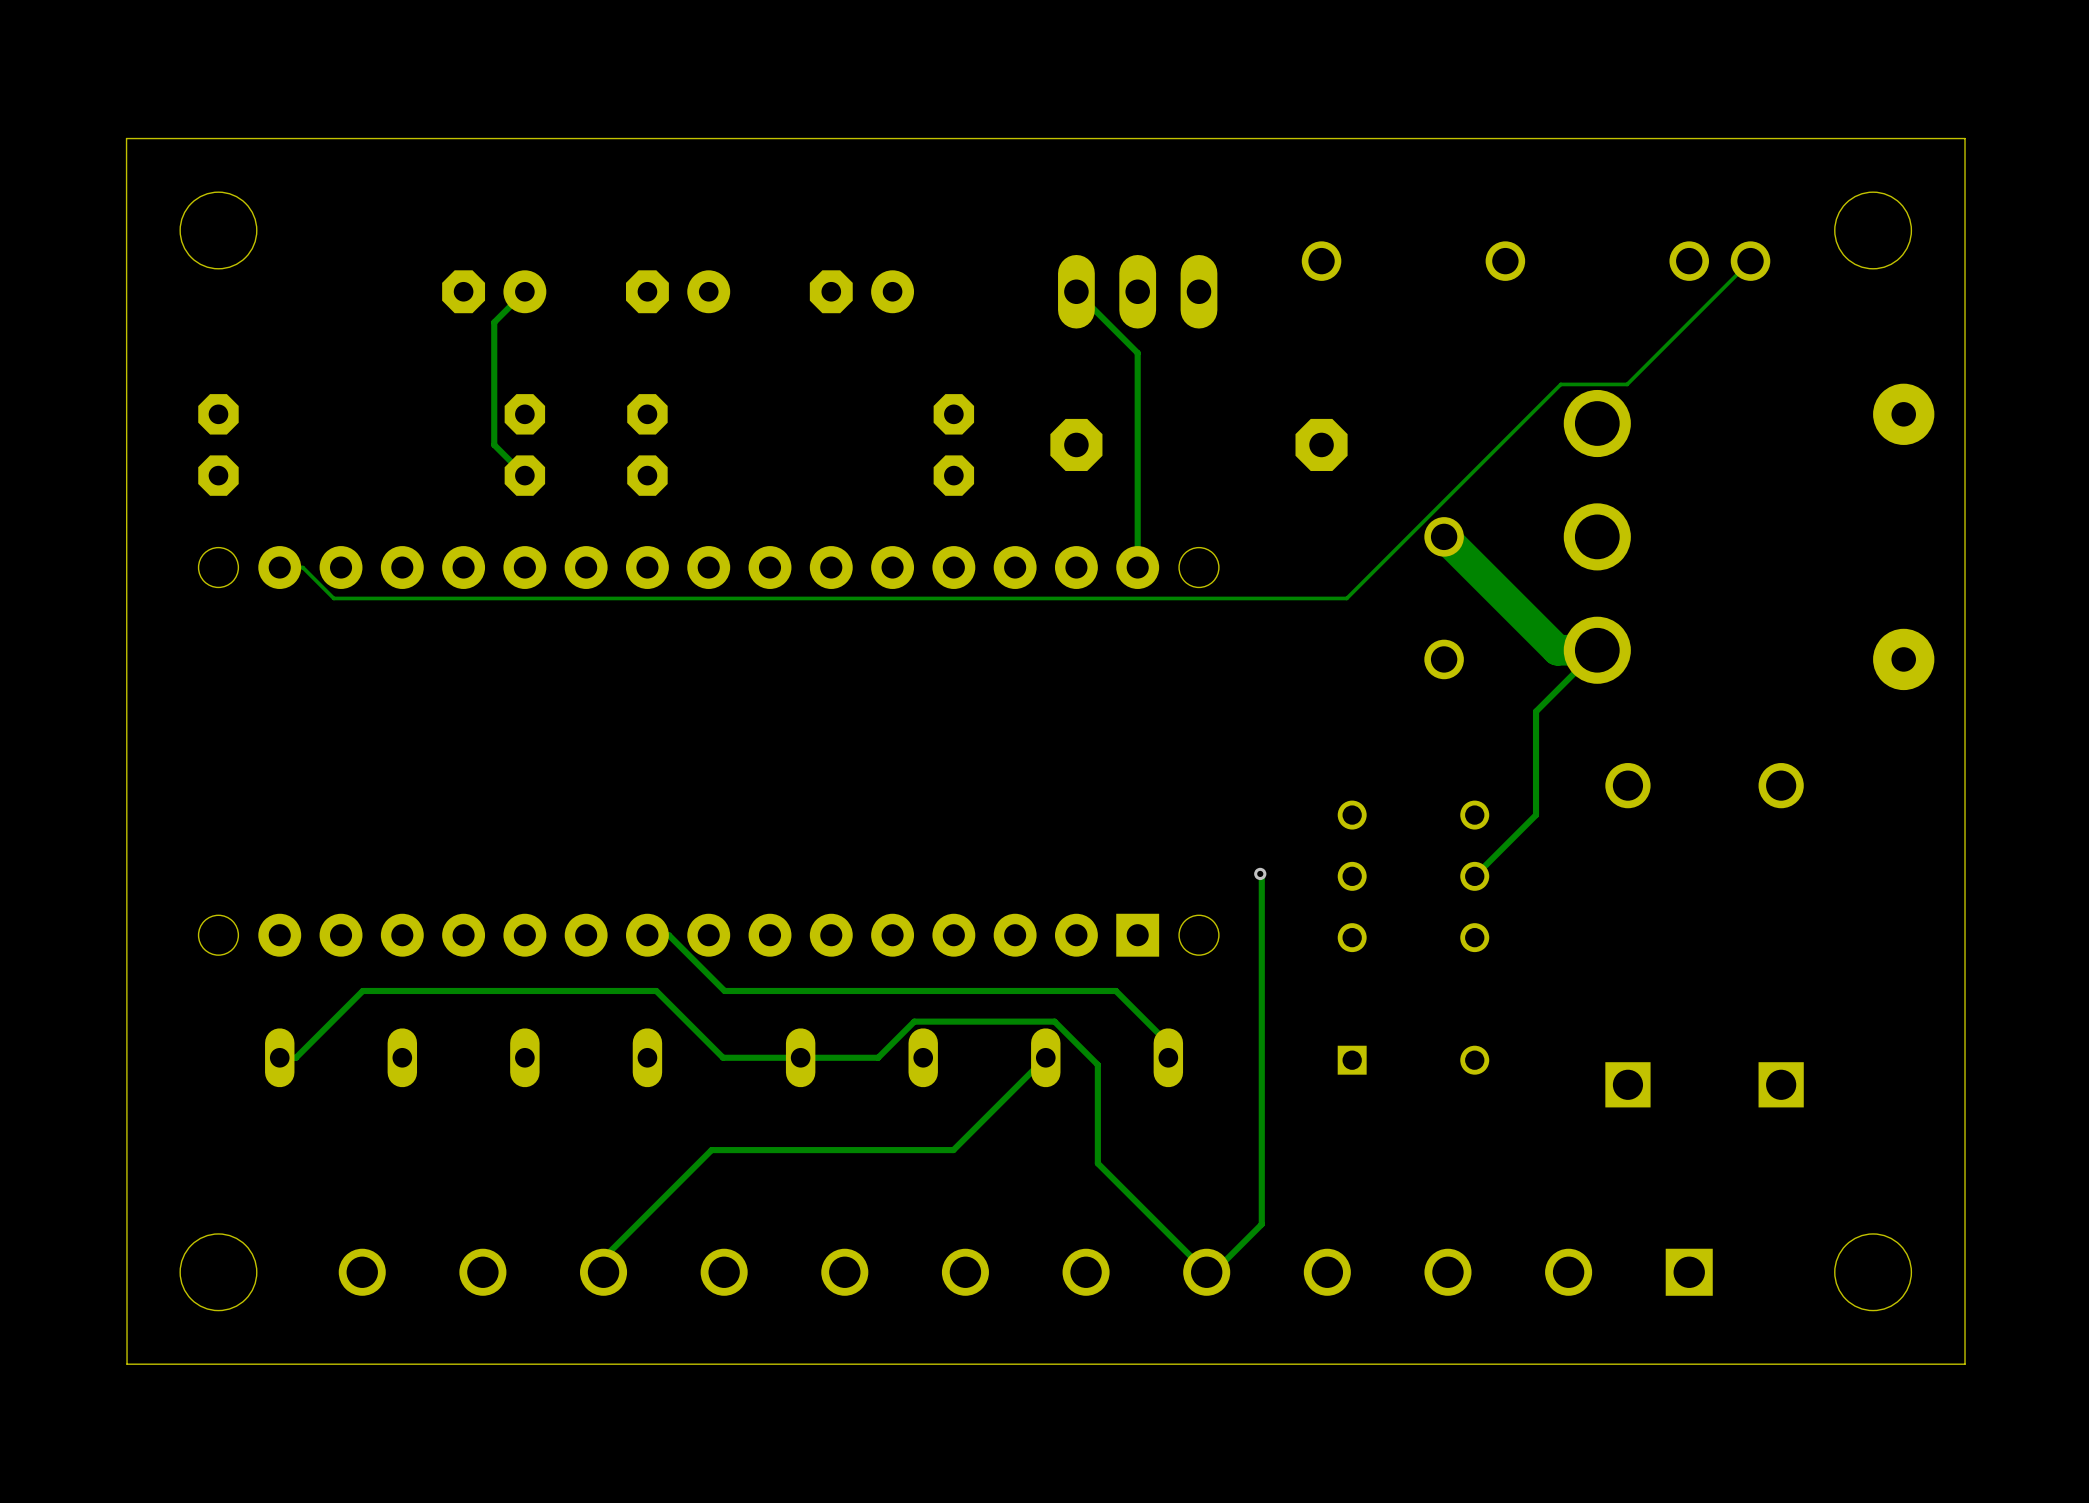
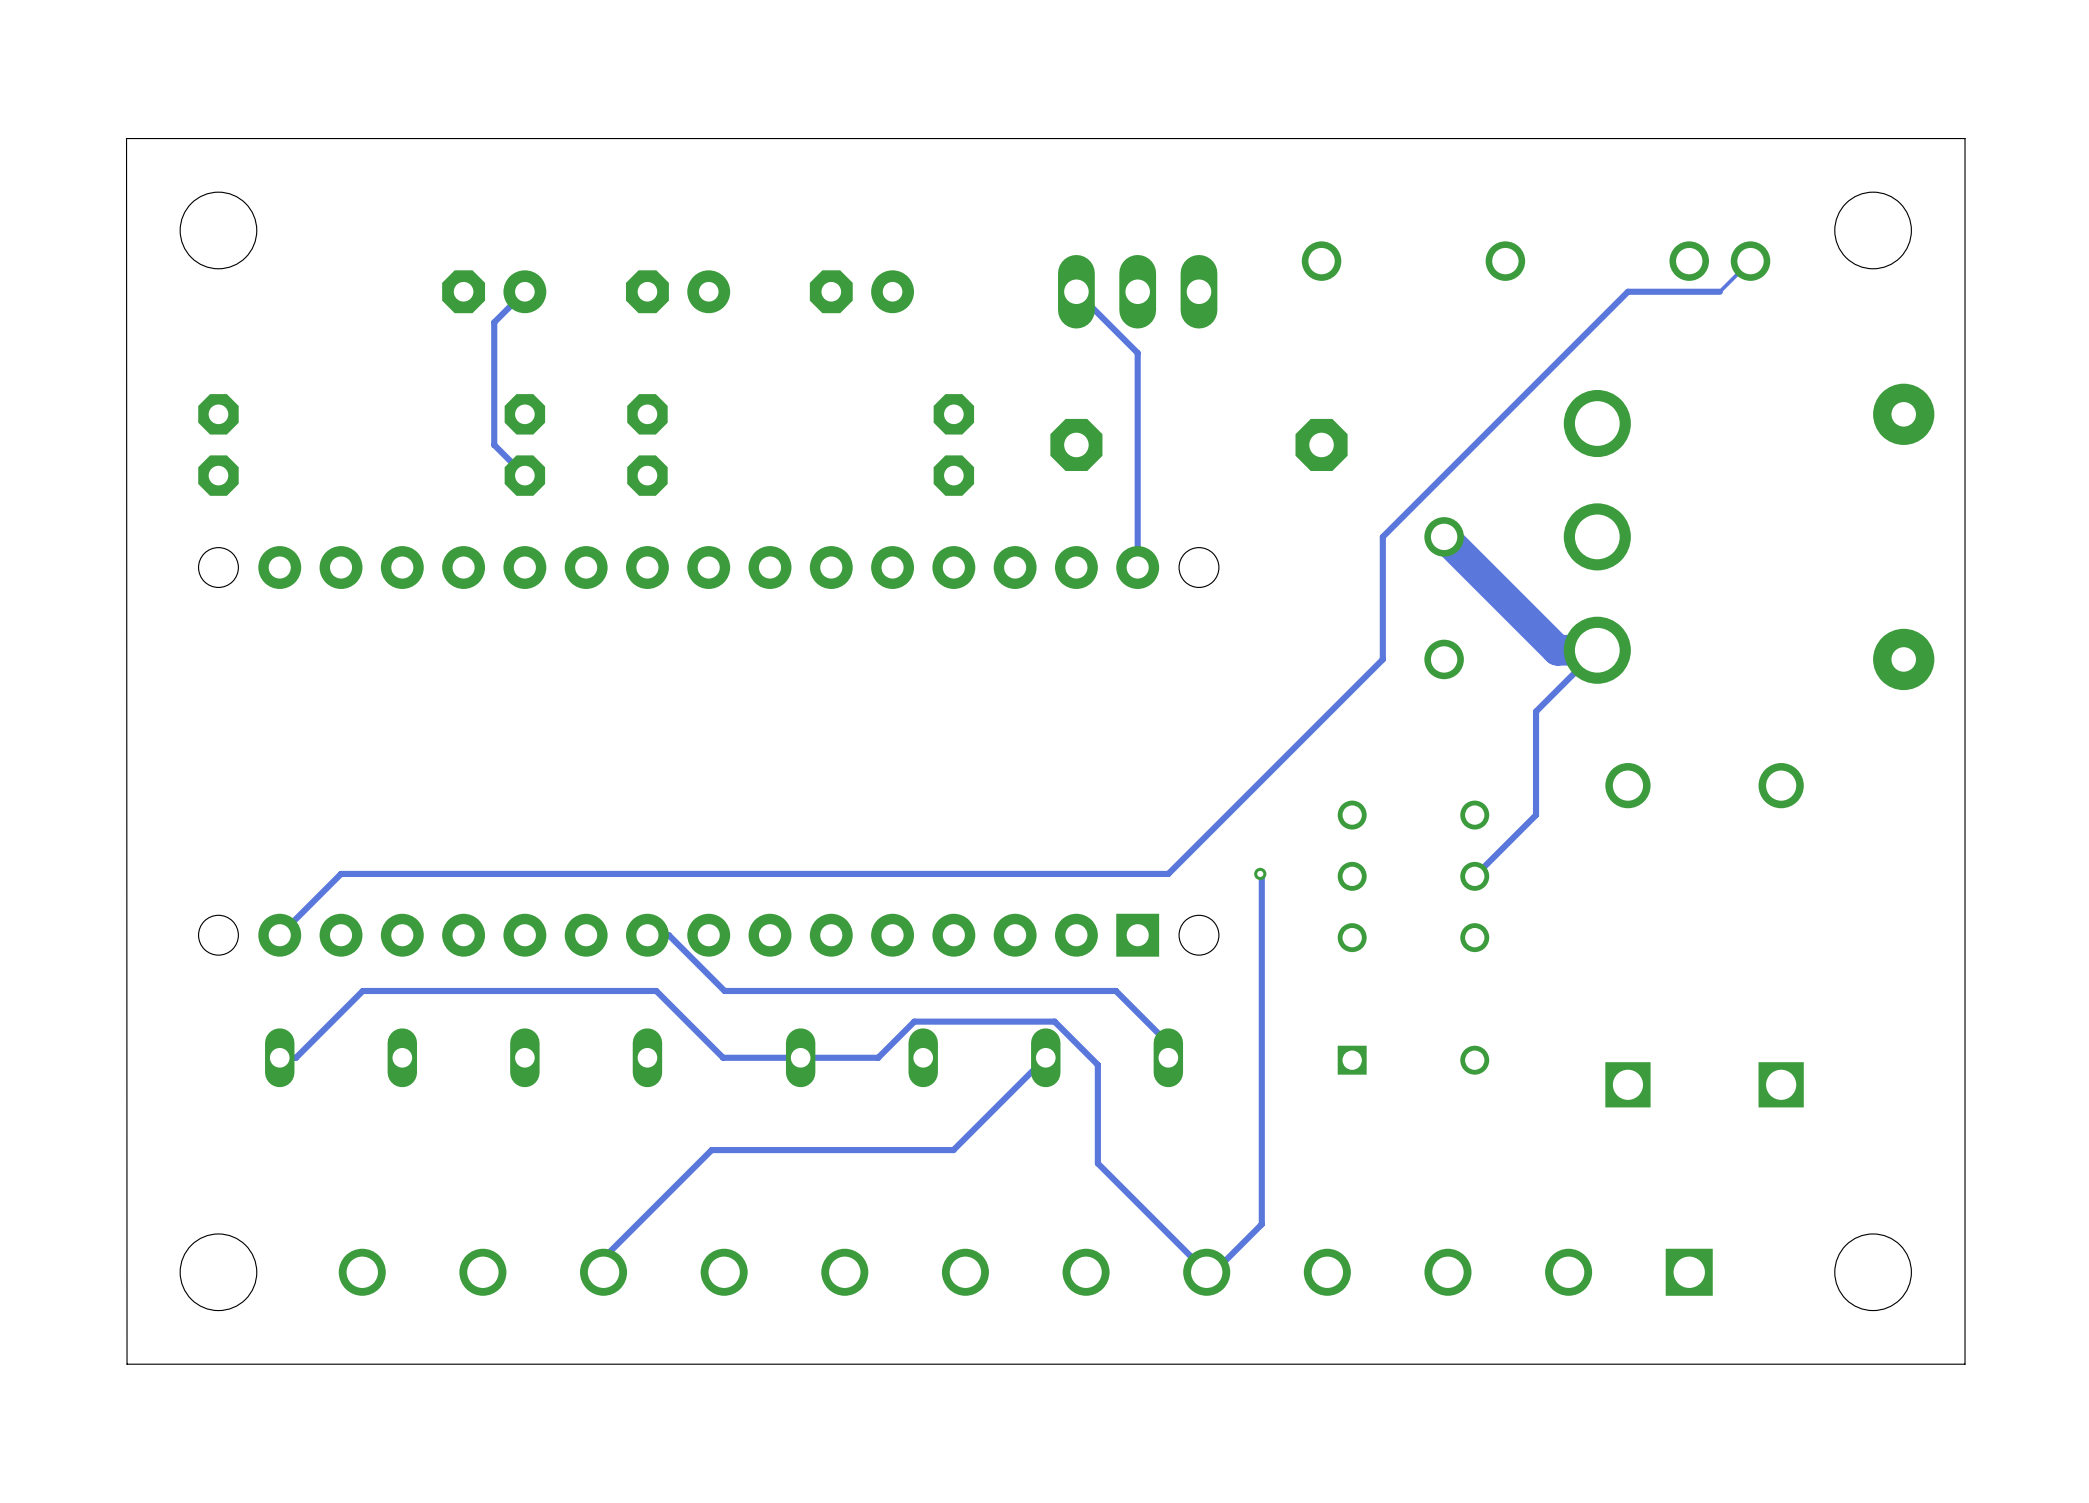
track: (1719, 291) (1627, 384) (1560, 384) (1346, 598) (333, 598) (302, 567) (279, 567) -> (1719, 291) (1627, 291) (1382, 536) (1382, 659) (1168, 873) (341, 873) (279, 935)

